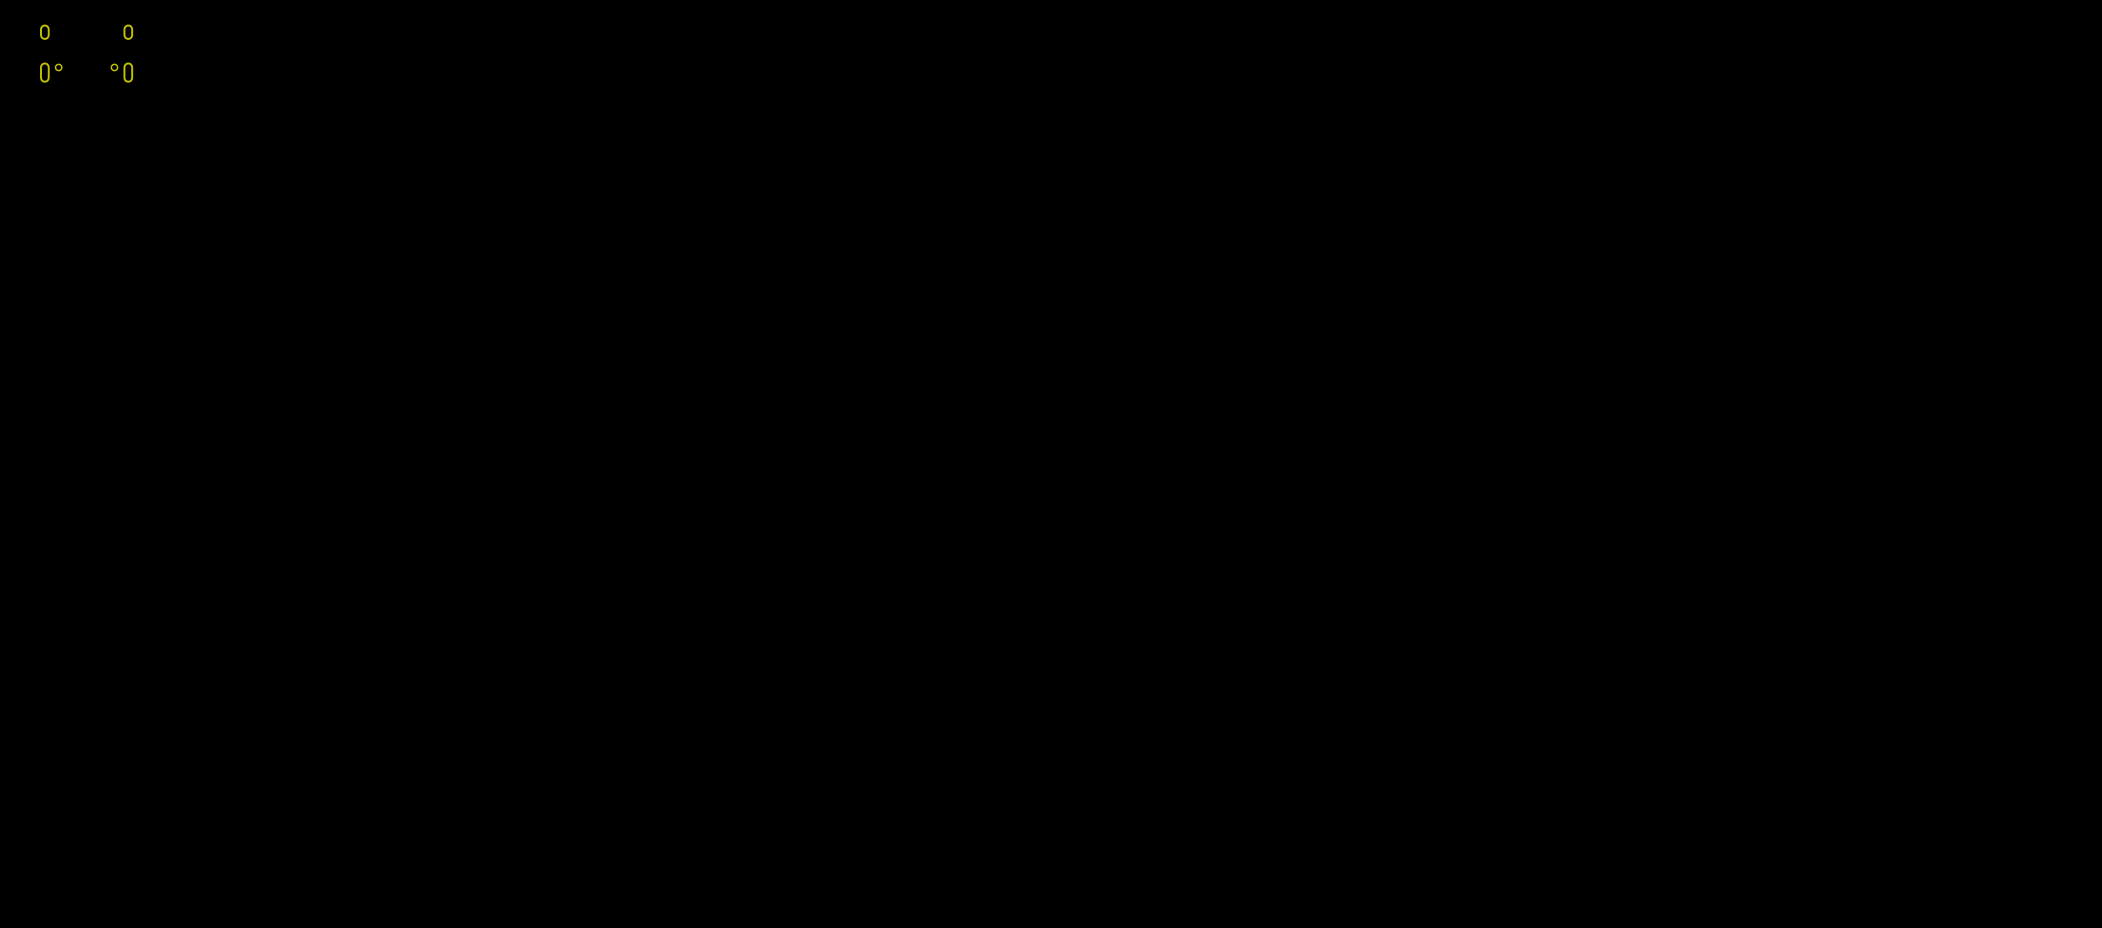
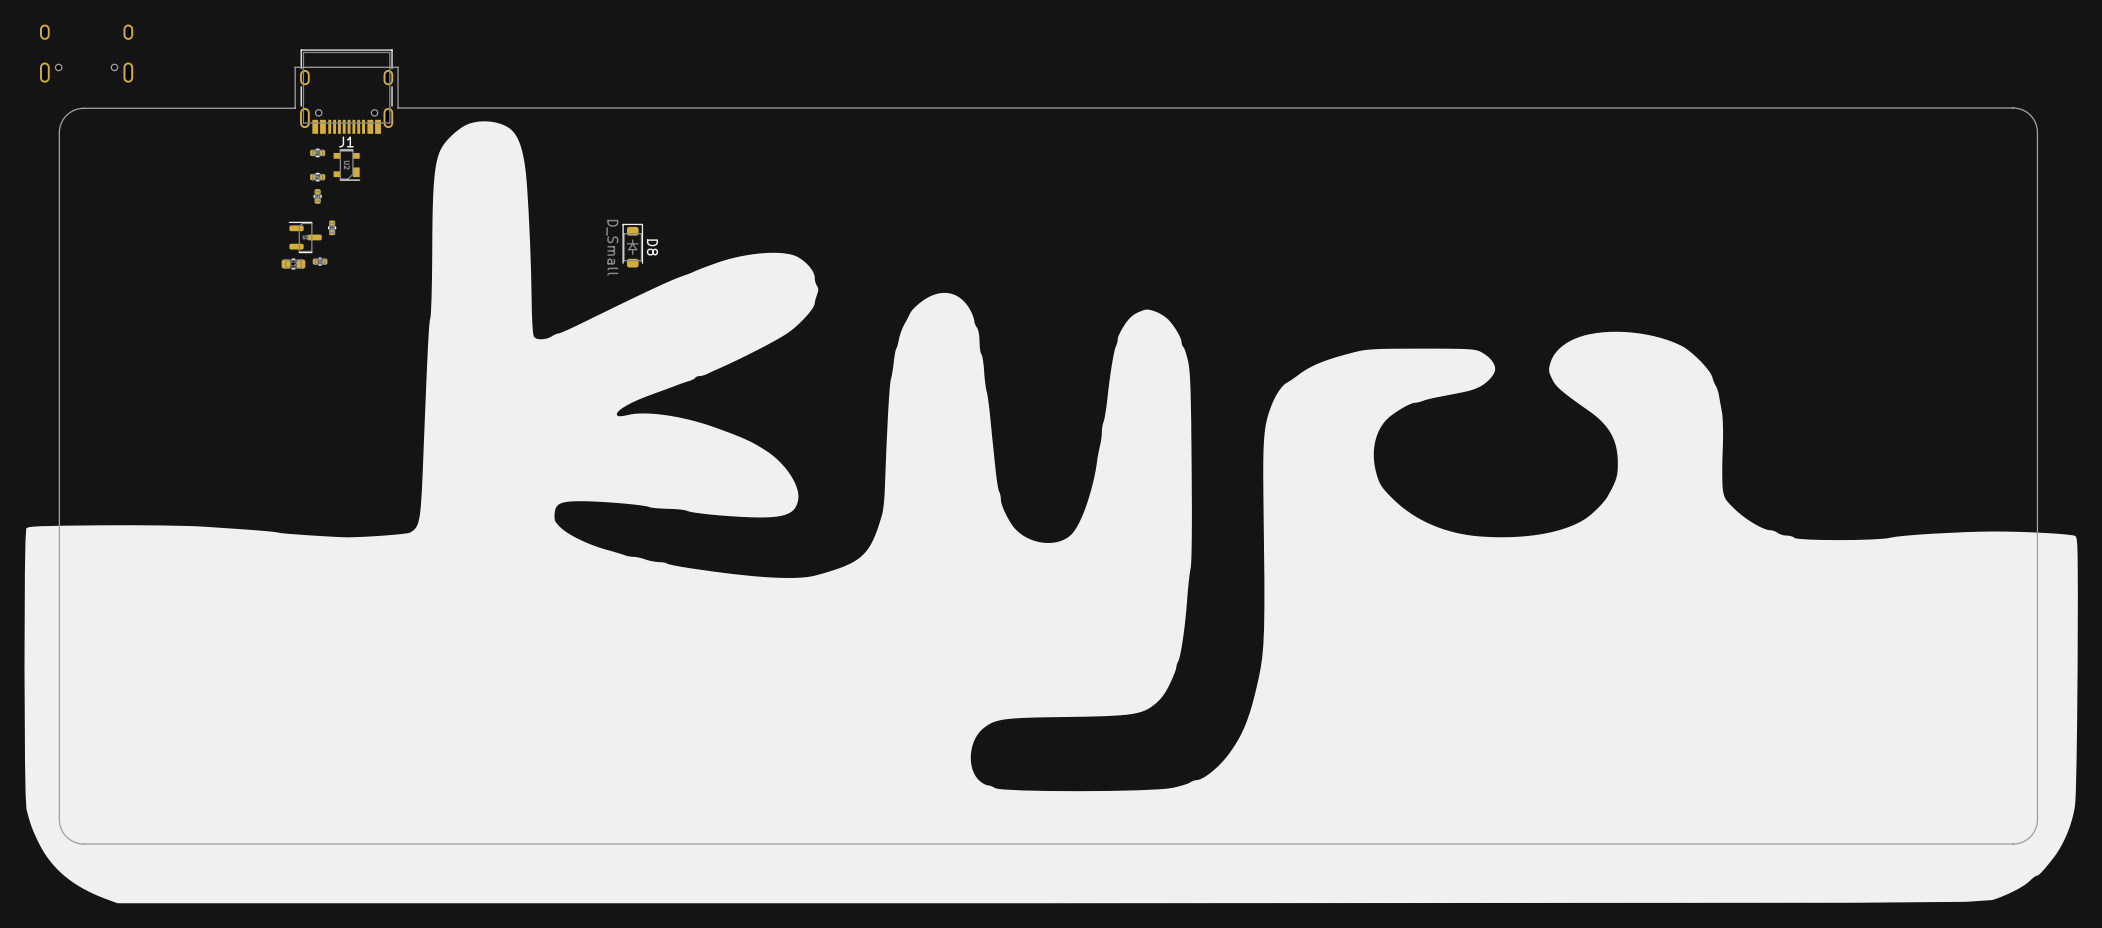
J1: none -> (346, 91)
board edge: none -> (398, 107) (2013, 107) (2022, 109) (2032, 117) (2037, 132) (2037, 819) (2035, 828) (2025, 840) (2013, 844) (83, 844) (74, 842) (62, 831) (59, 819) (59, 132) (61, 123) (68, 113) (83, 108) (295, 108) (295, 67) (398, 67) (398, 107)
drawing: none -> [24, 121, 2078, 904]
part: none -> (317, 152)
part: none -> (346, 165)
part: none -> (317, 177)
part: none -> (317, 196)
part: none -> (332, 227)
part: none -> (305, 237)
D8: none -> D_Small (632, 245)
part: none -> (320, 261)
part: none -> (293, 264)

